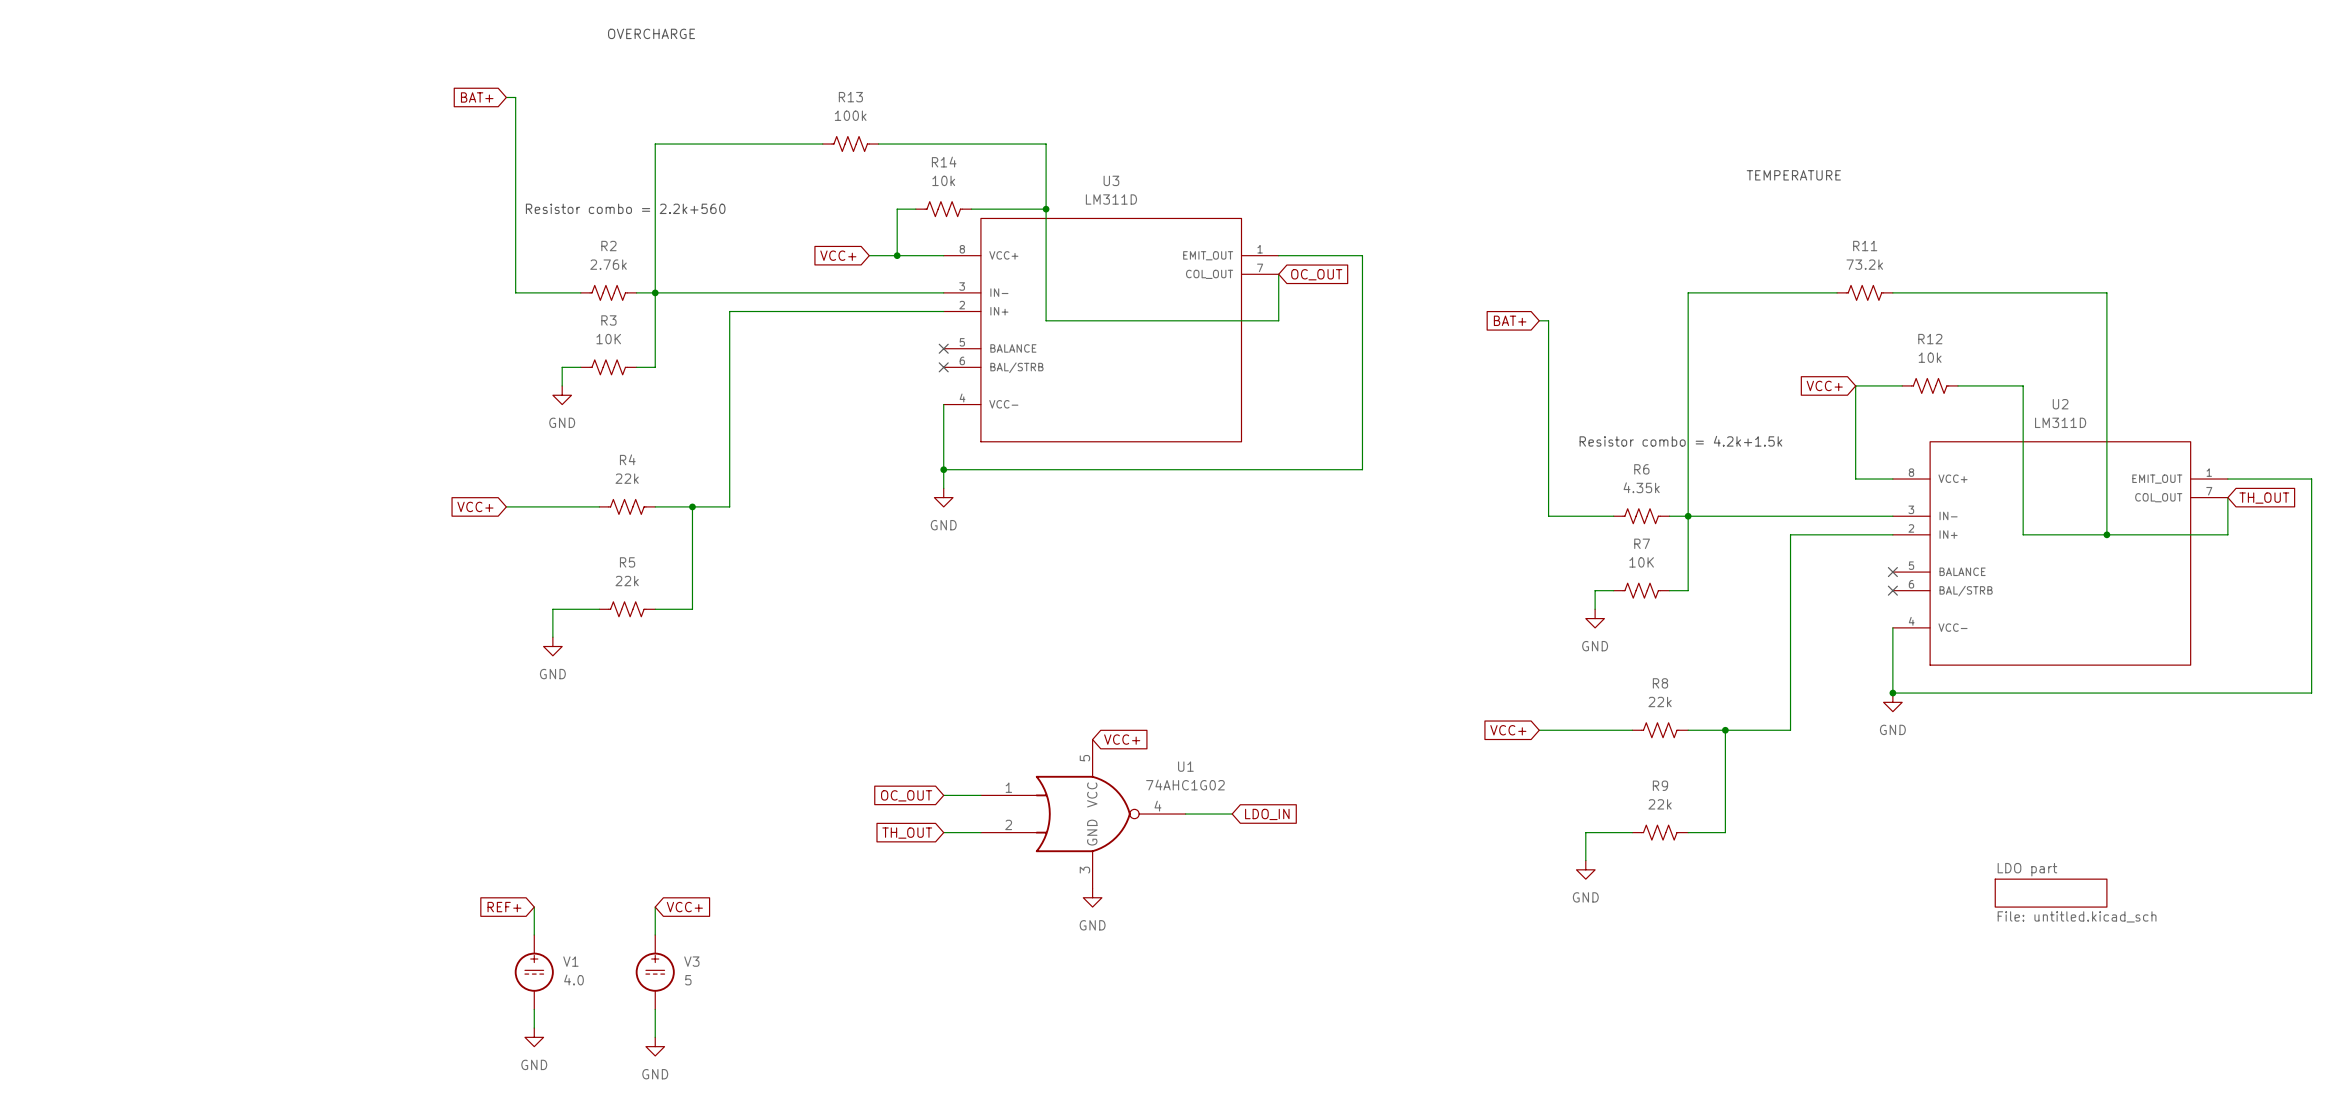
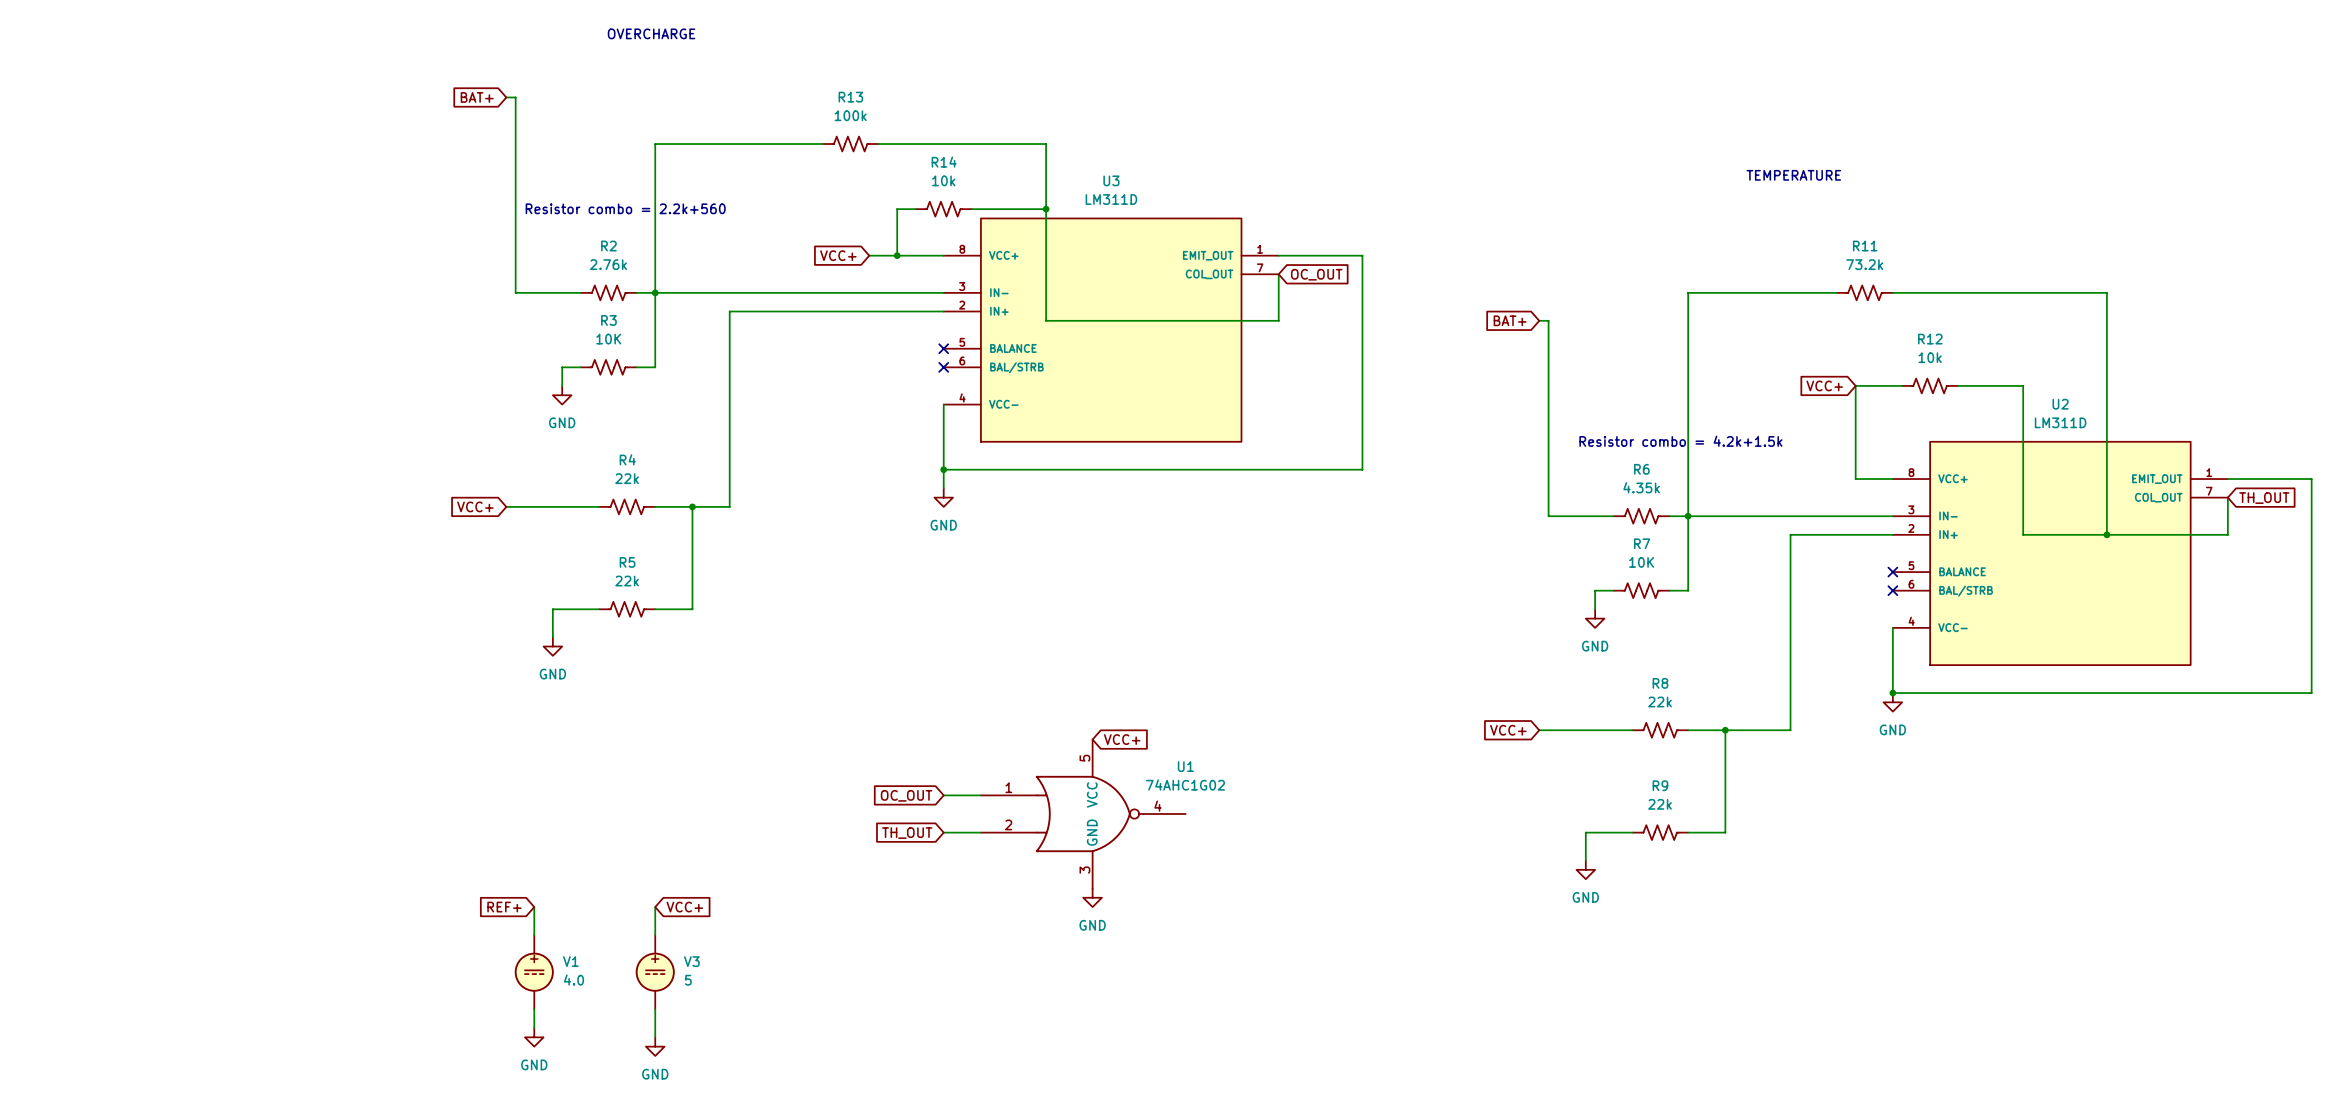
wire: (1185, 814) (1232, 814) -> none
global label: LDO_IN (1267, 814) -> none
sheet LDO part: File: untitled.kicad_sch (2051, 893) -> none

